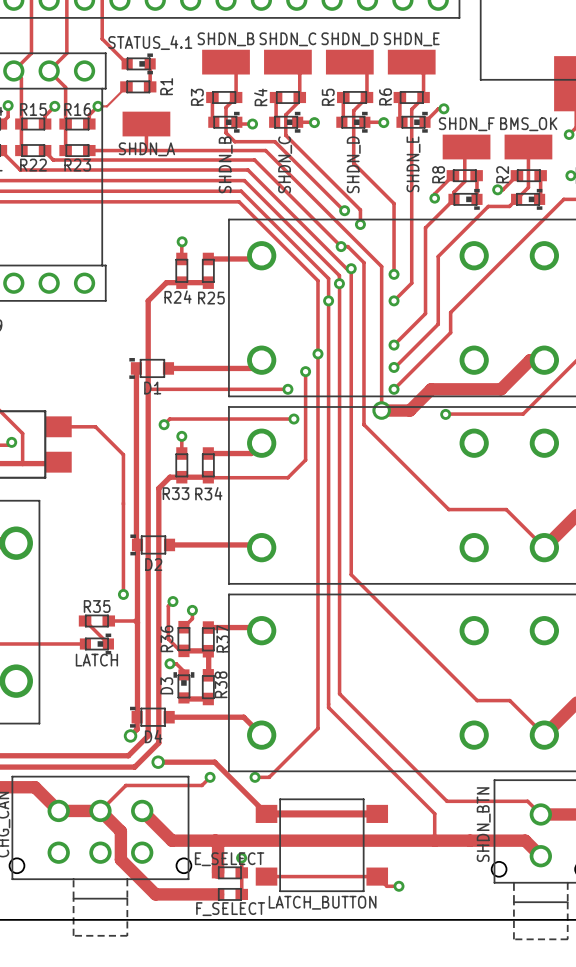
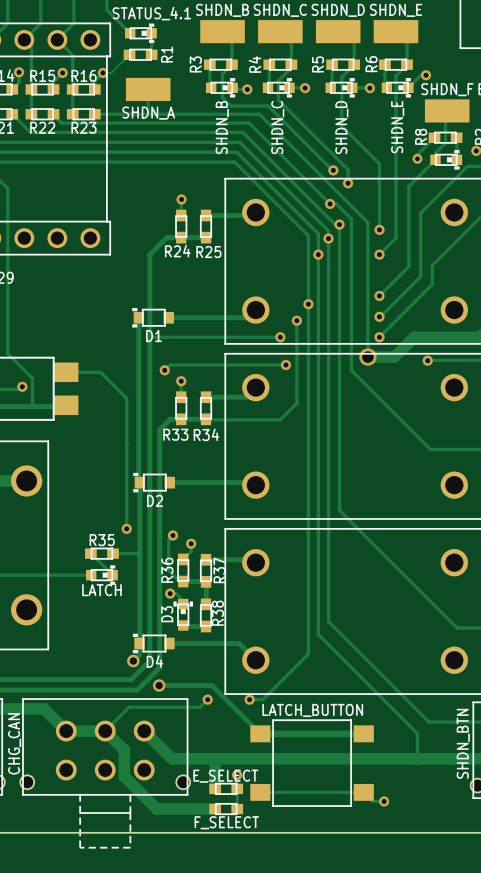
LATCH_BUTTON name position: LATCH_BUTTON (322, 902) -> LATCH_BUTTON (312, 710)

